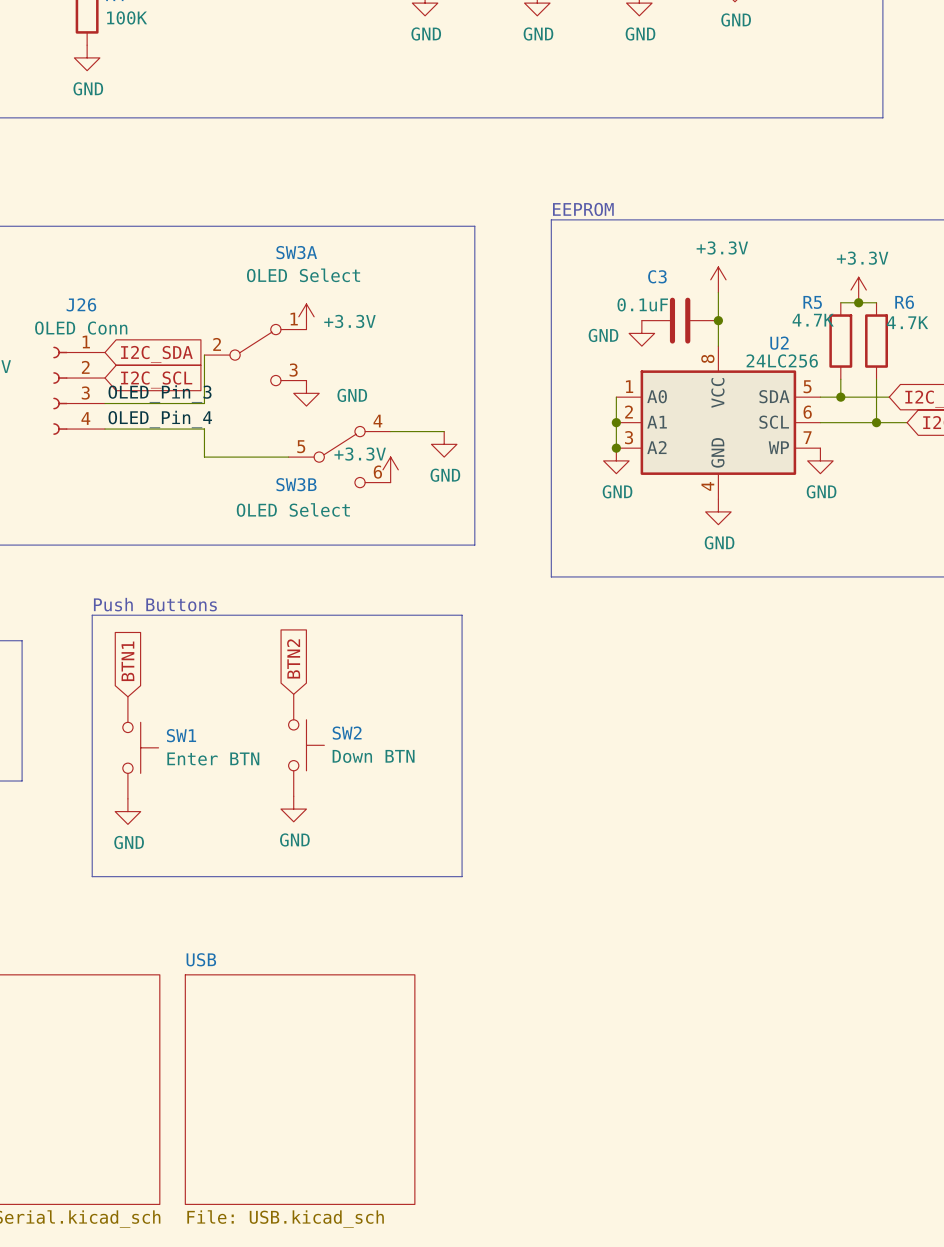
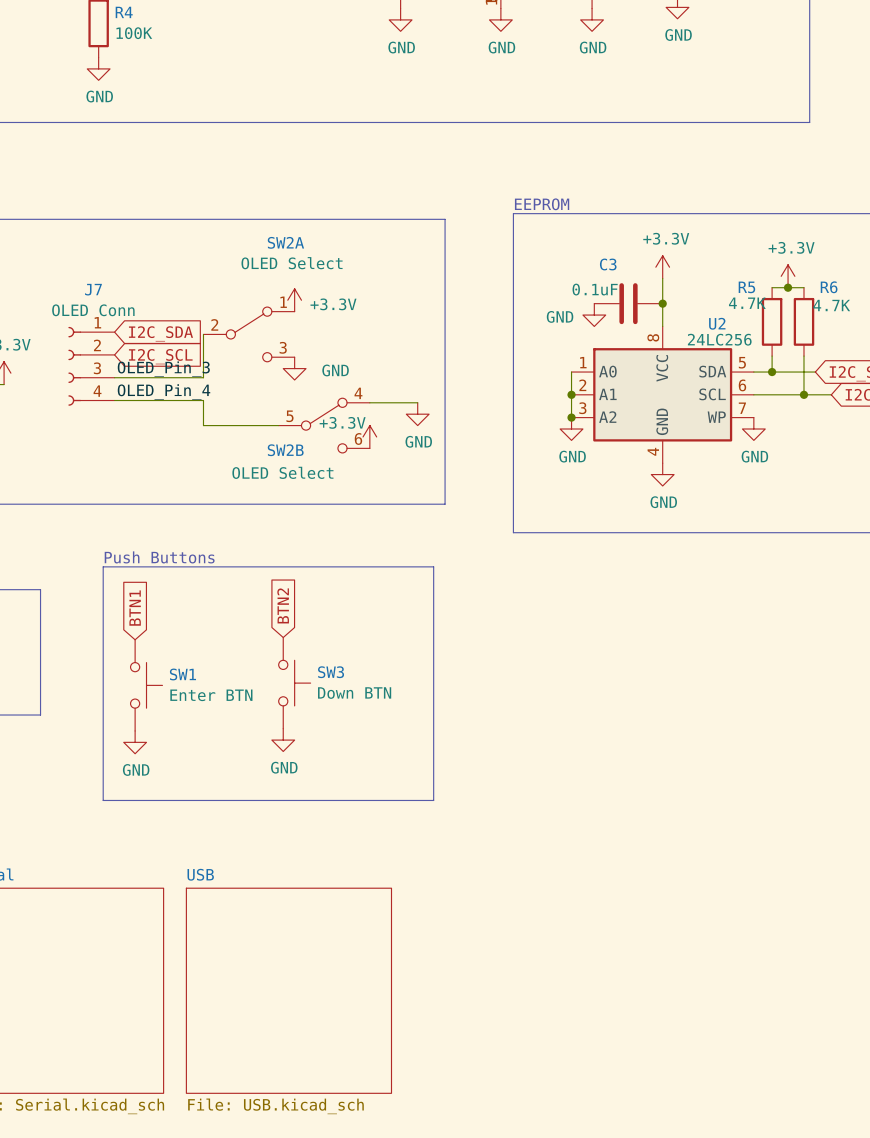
SW3A name: SW3A (296, 252) -> SW2A (285, 242)
J26 name: J26 (81, 304) -> J7 (93, 289)
SW3B name: SW3B (296, 484) -> SW2B (285, 450)
SW2 name: SW2 (347, 733) -> SW3 (331, 672)

